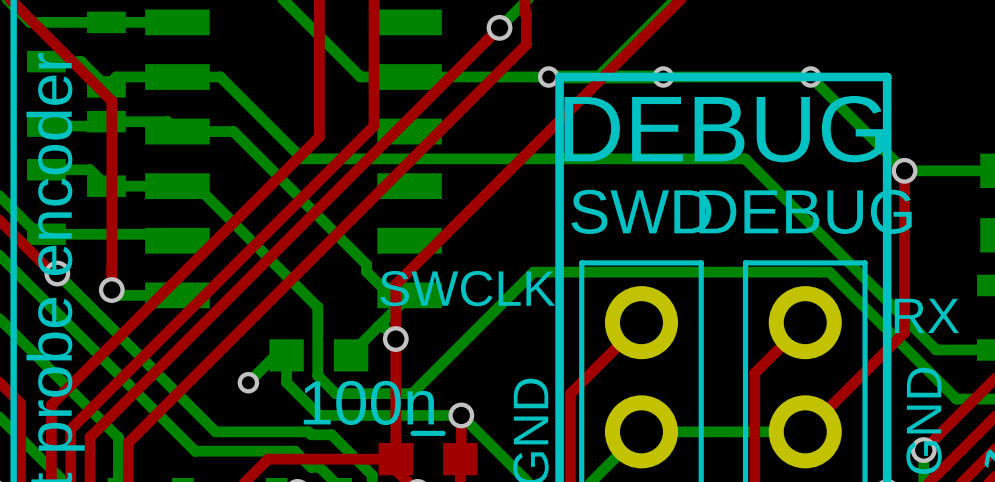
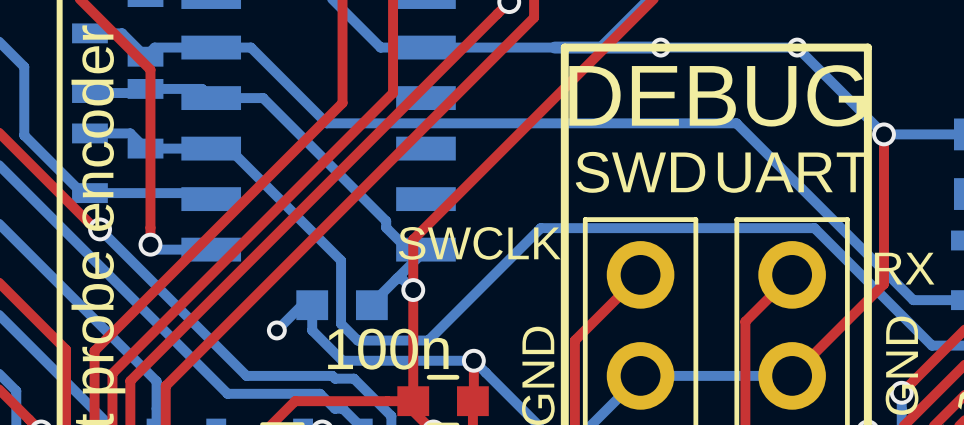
via: (548, 76) -> none
part value: DEBUG (805, 211) -> UART (793, 172)

